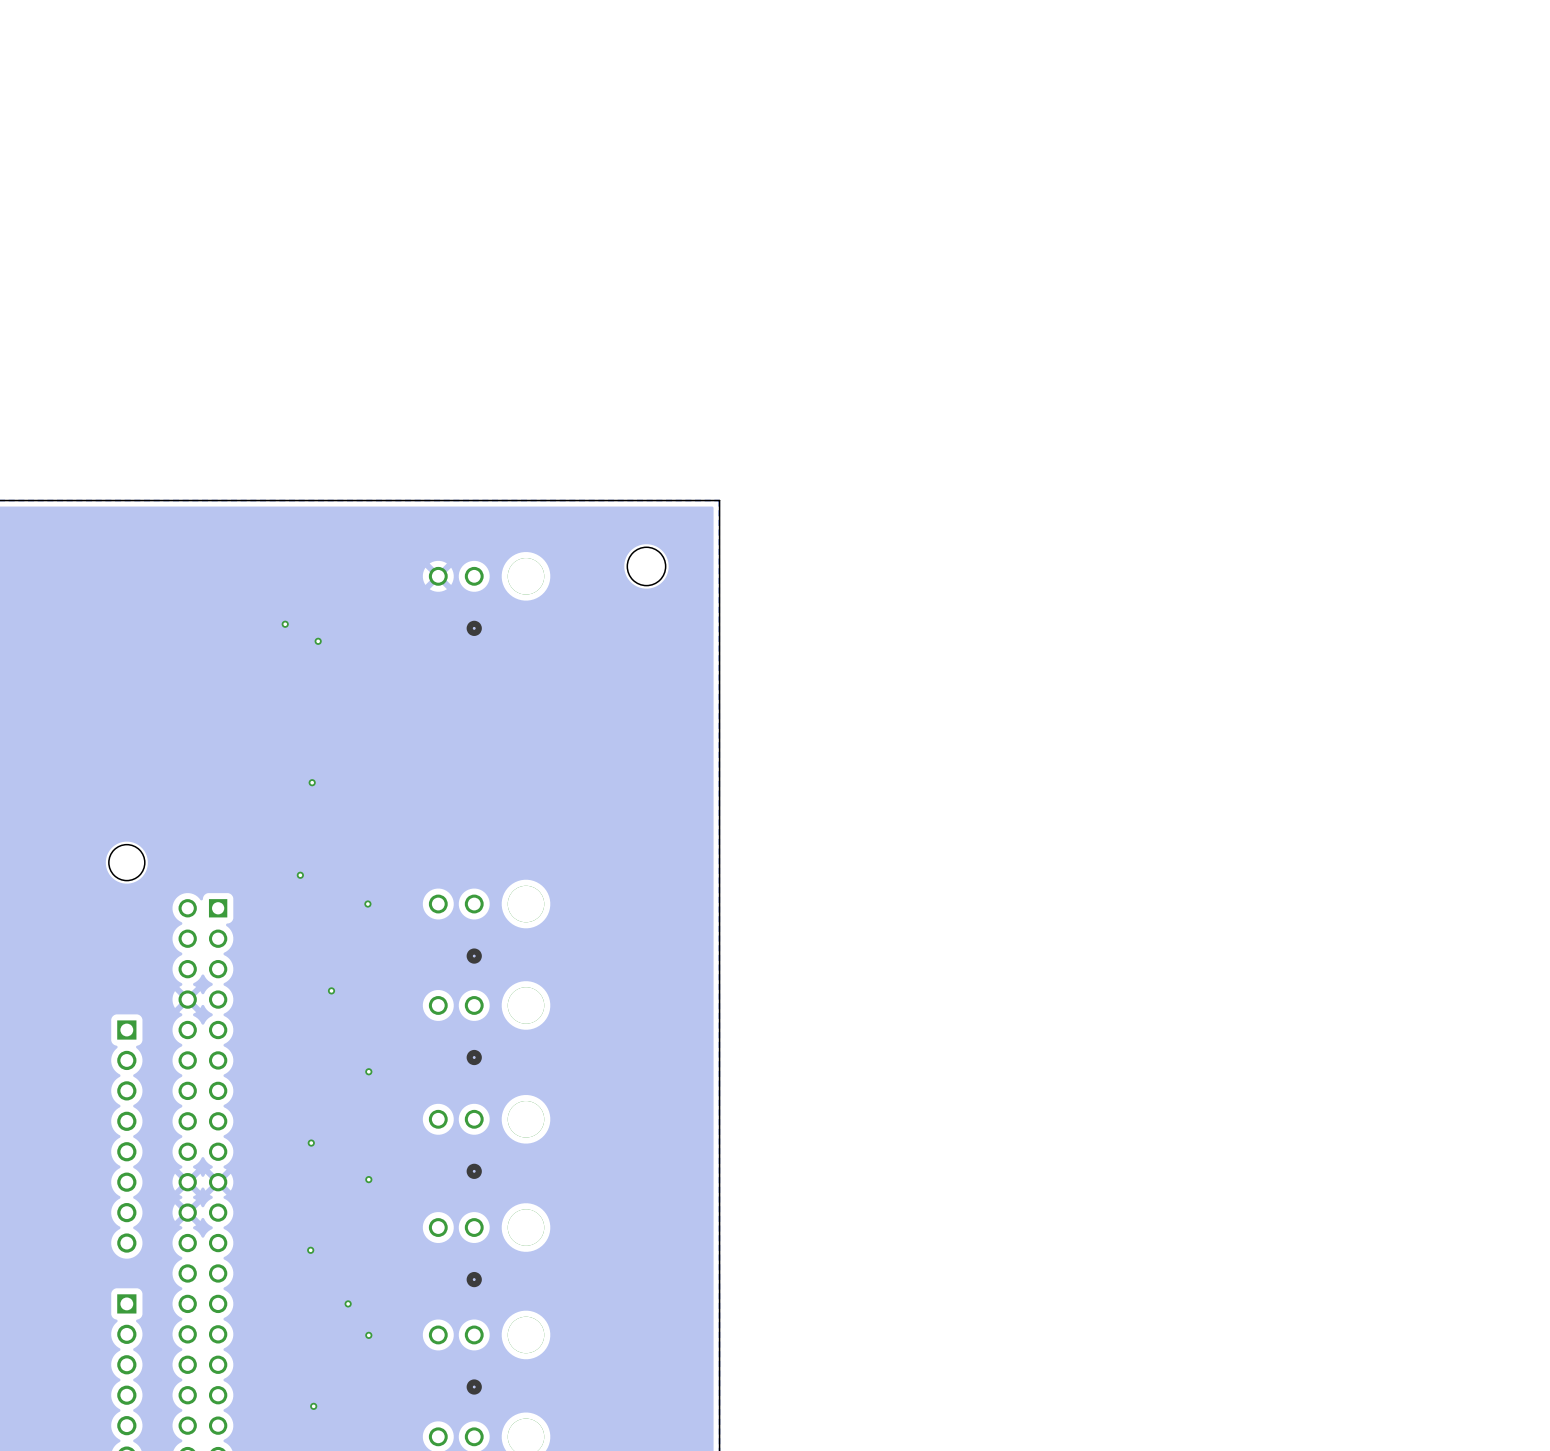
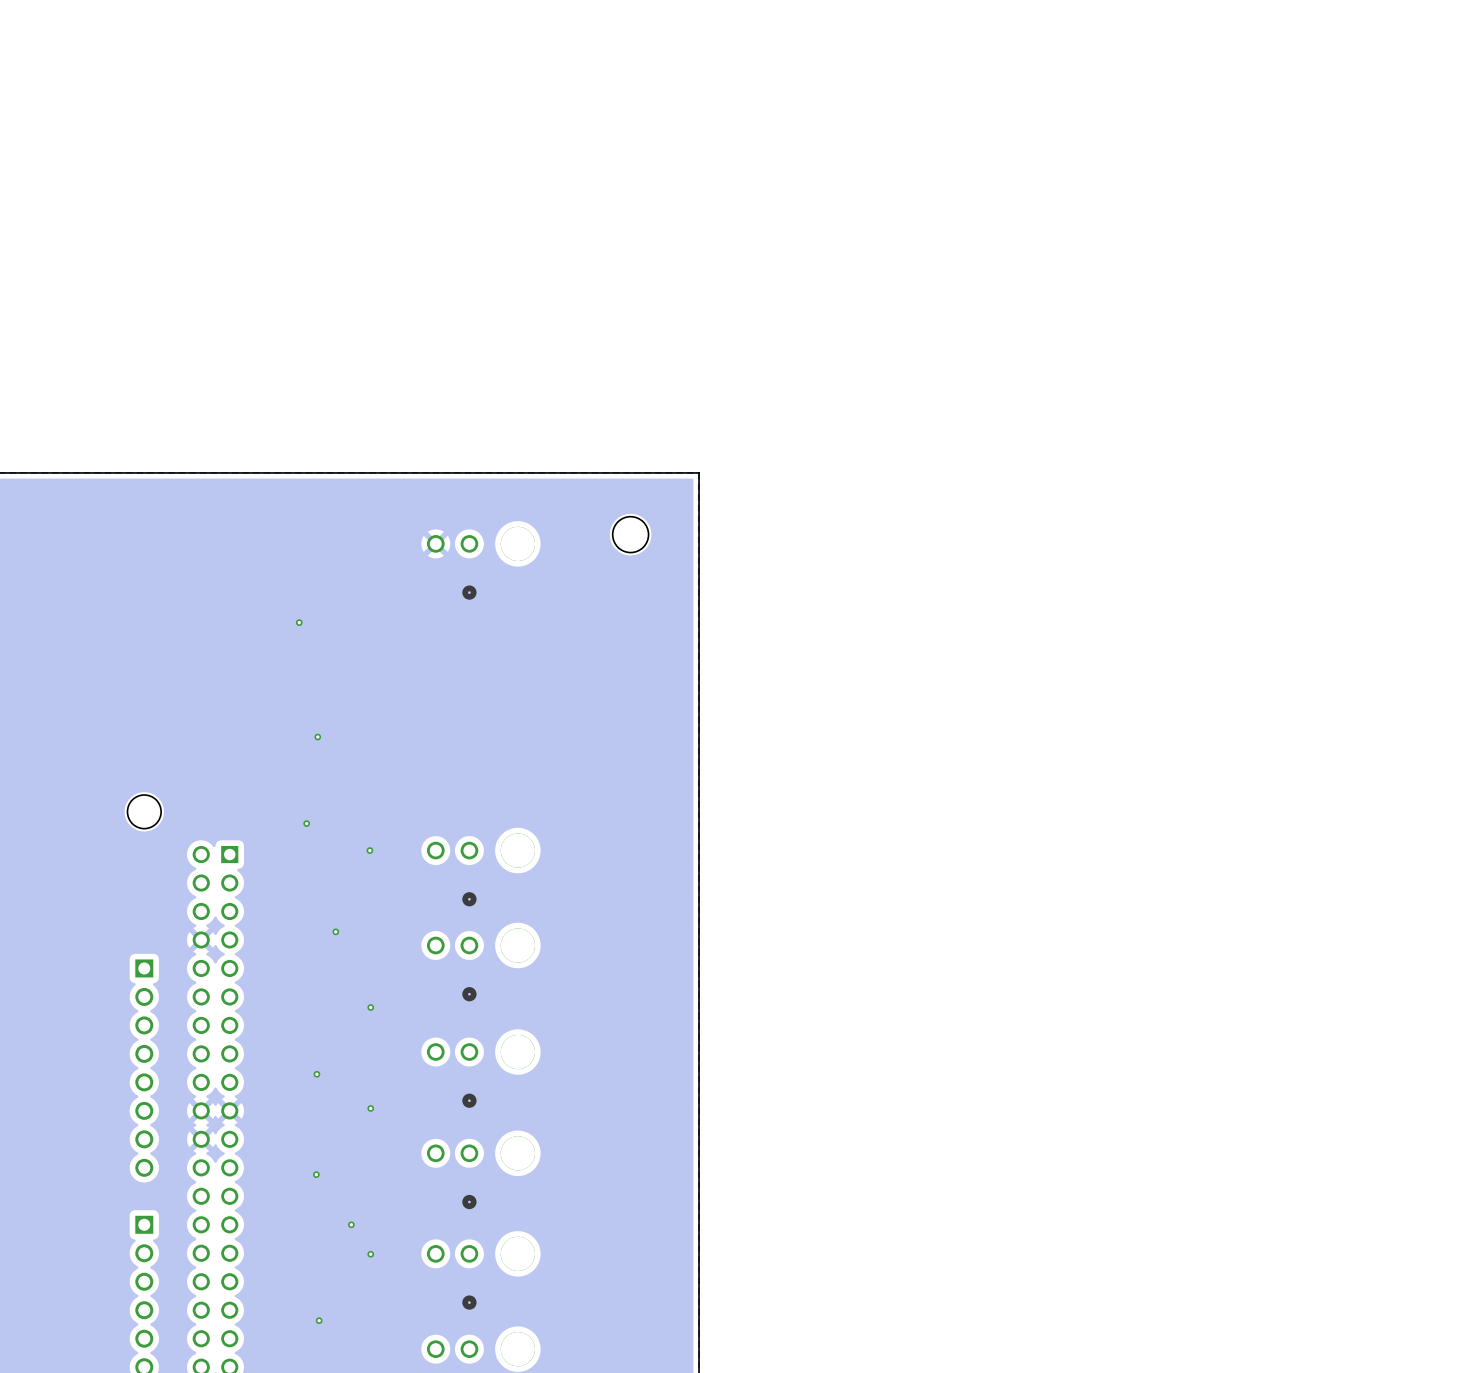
via: (285, 624) -> none
via: (318, 641) -> none
via: none -> (299, 622)

